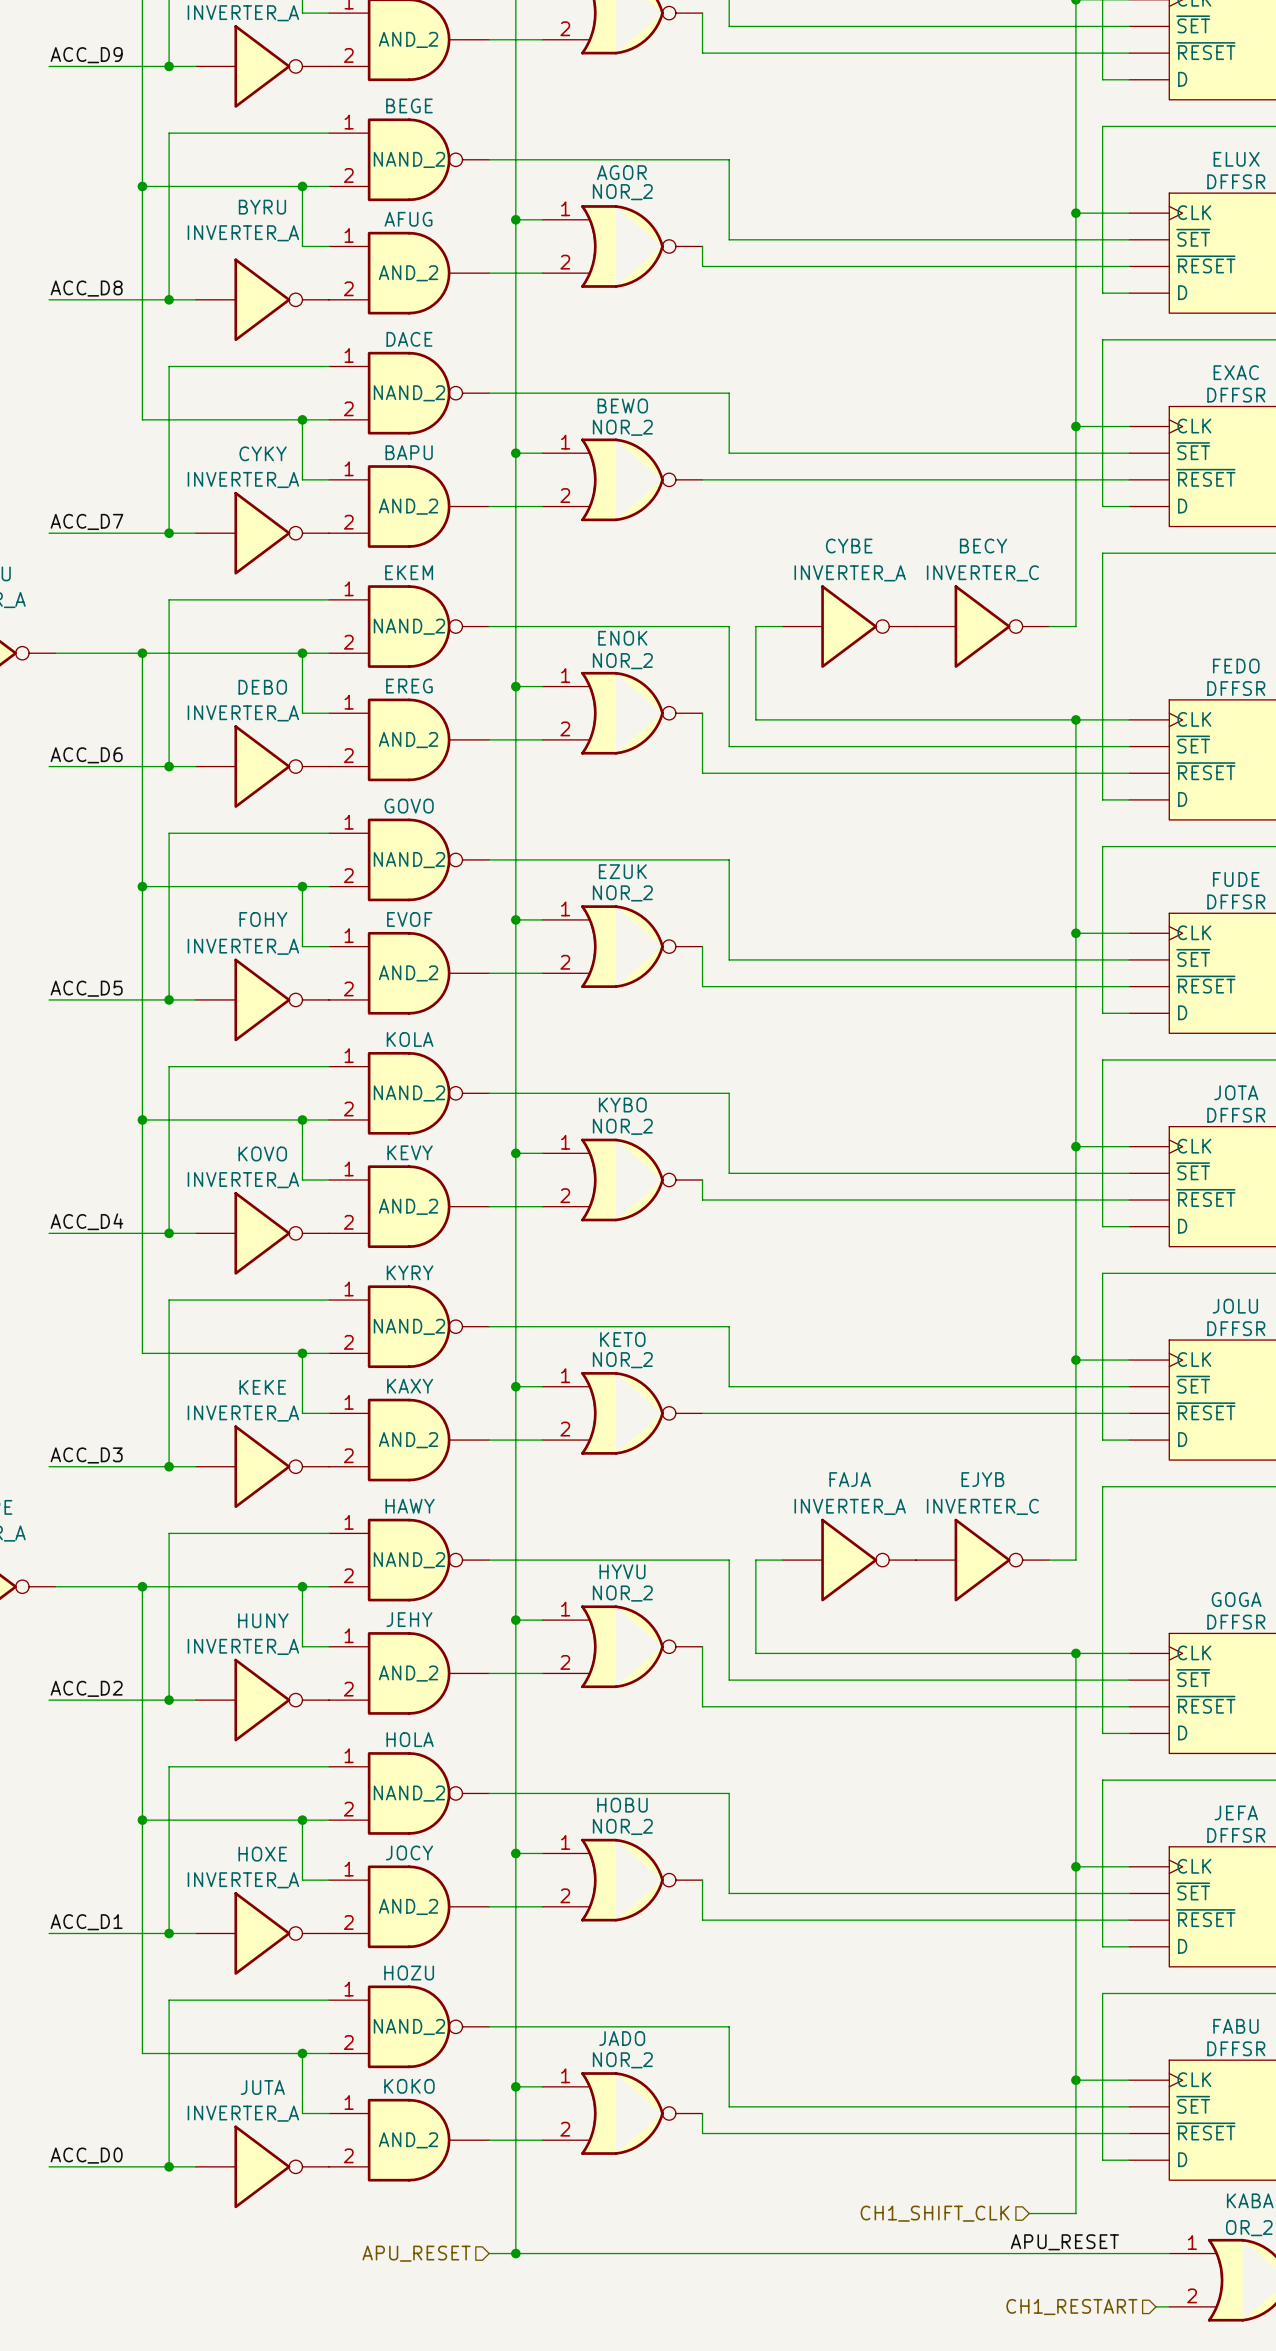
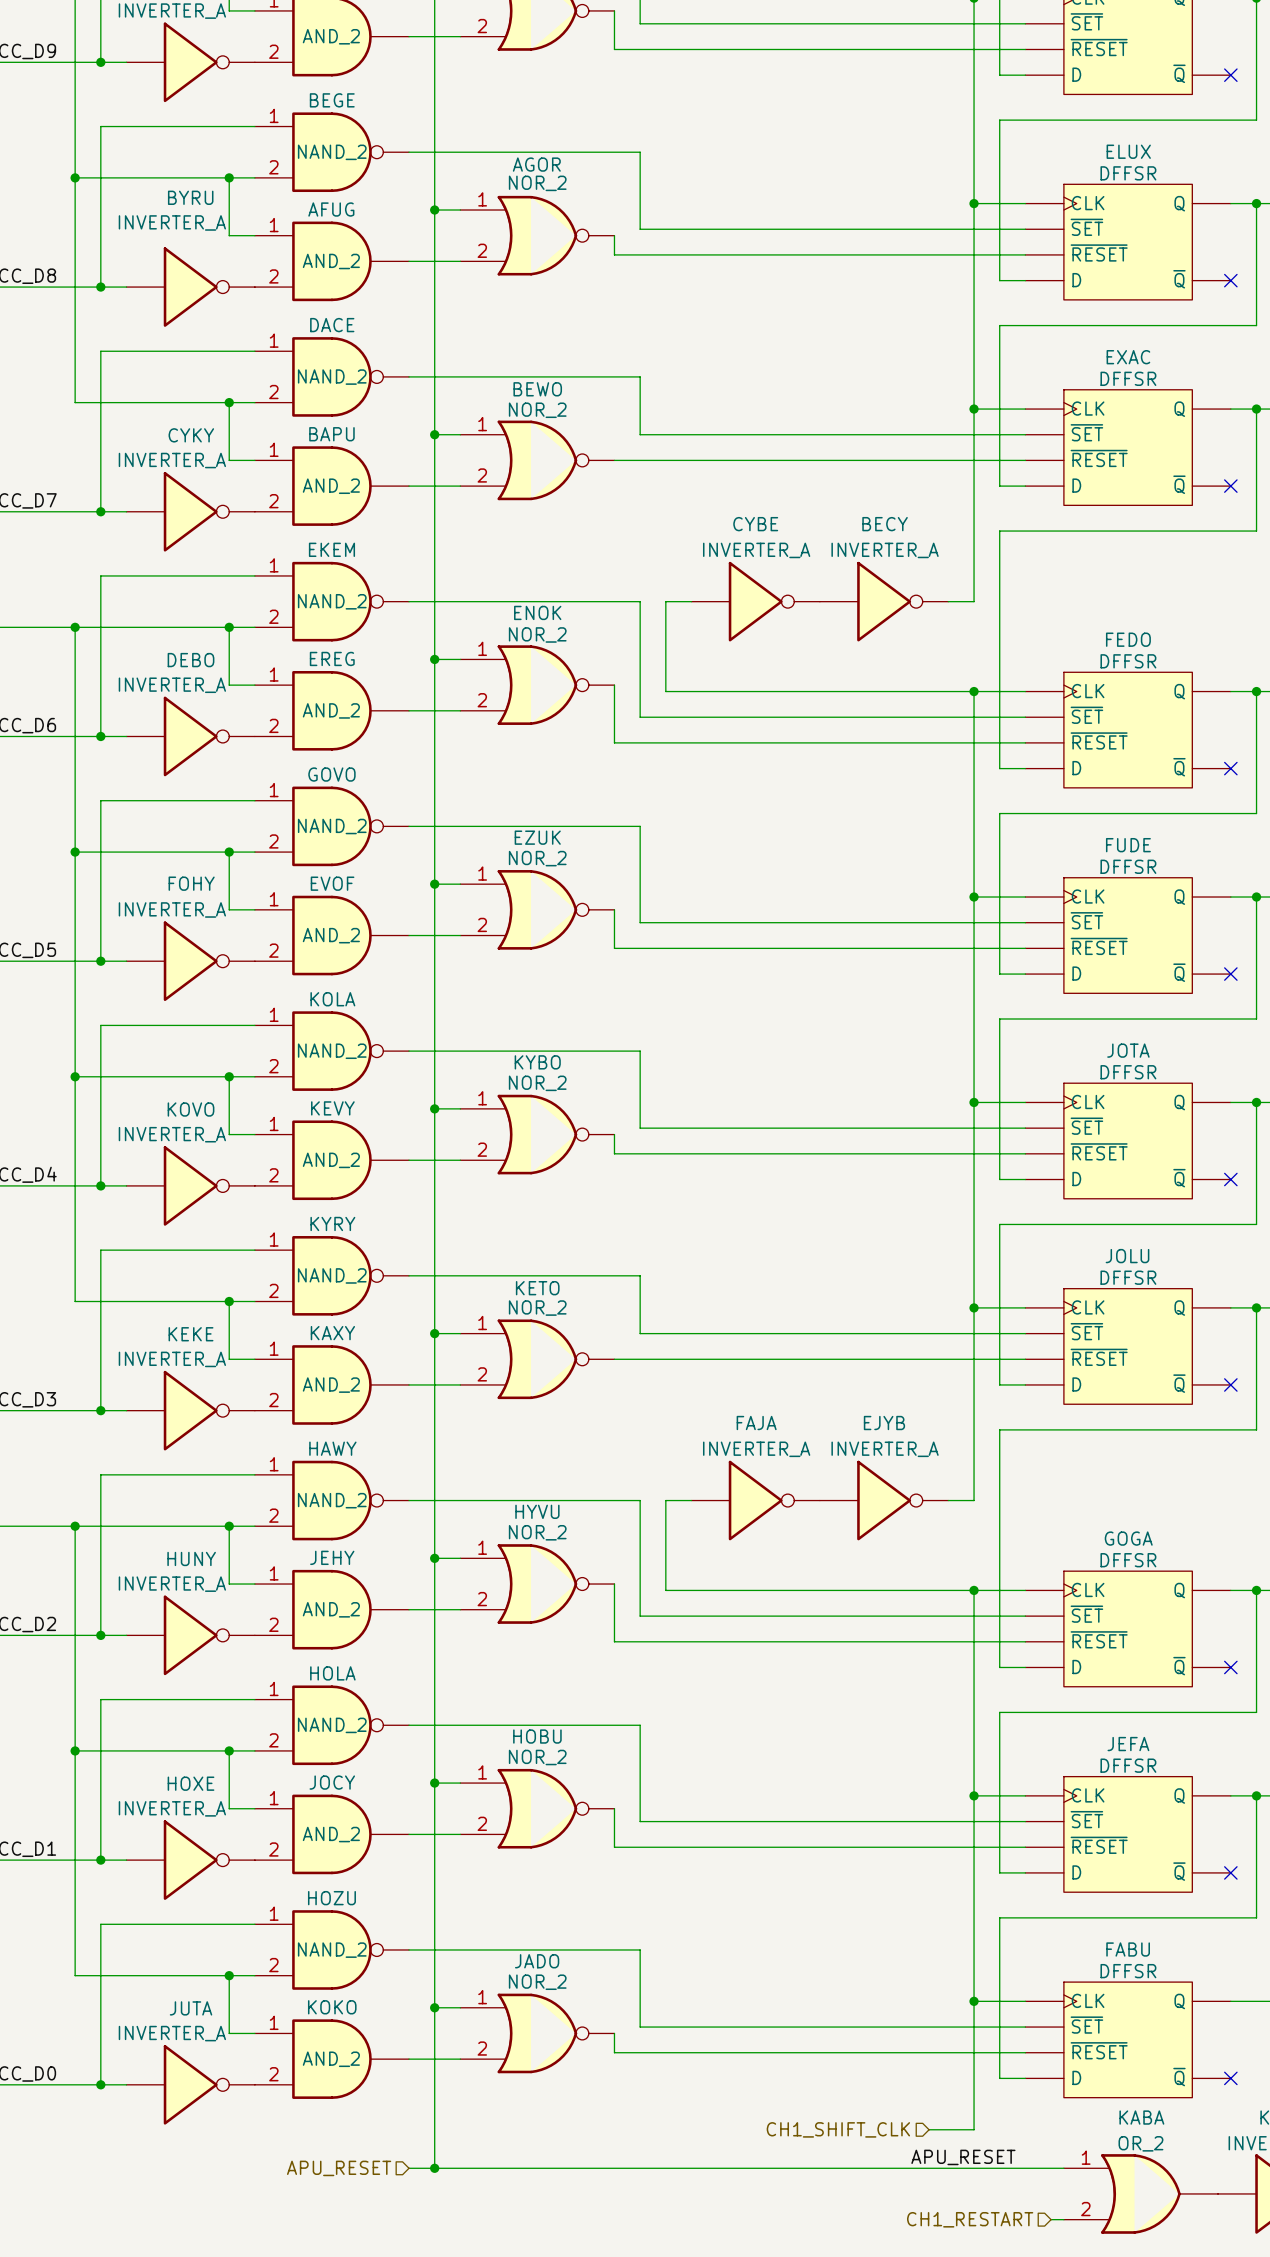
BECY value: INVERTER_C (982, 573) -> INVERTER_A (885, 550)
EJYB value: INVERTER_C (982, 1506) -> INVERTER_A (885, 1449)

